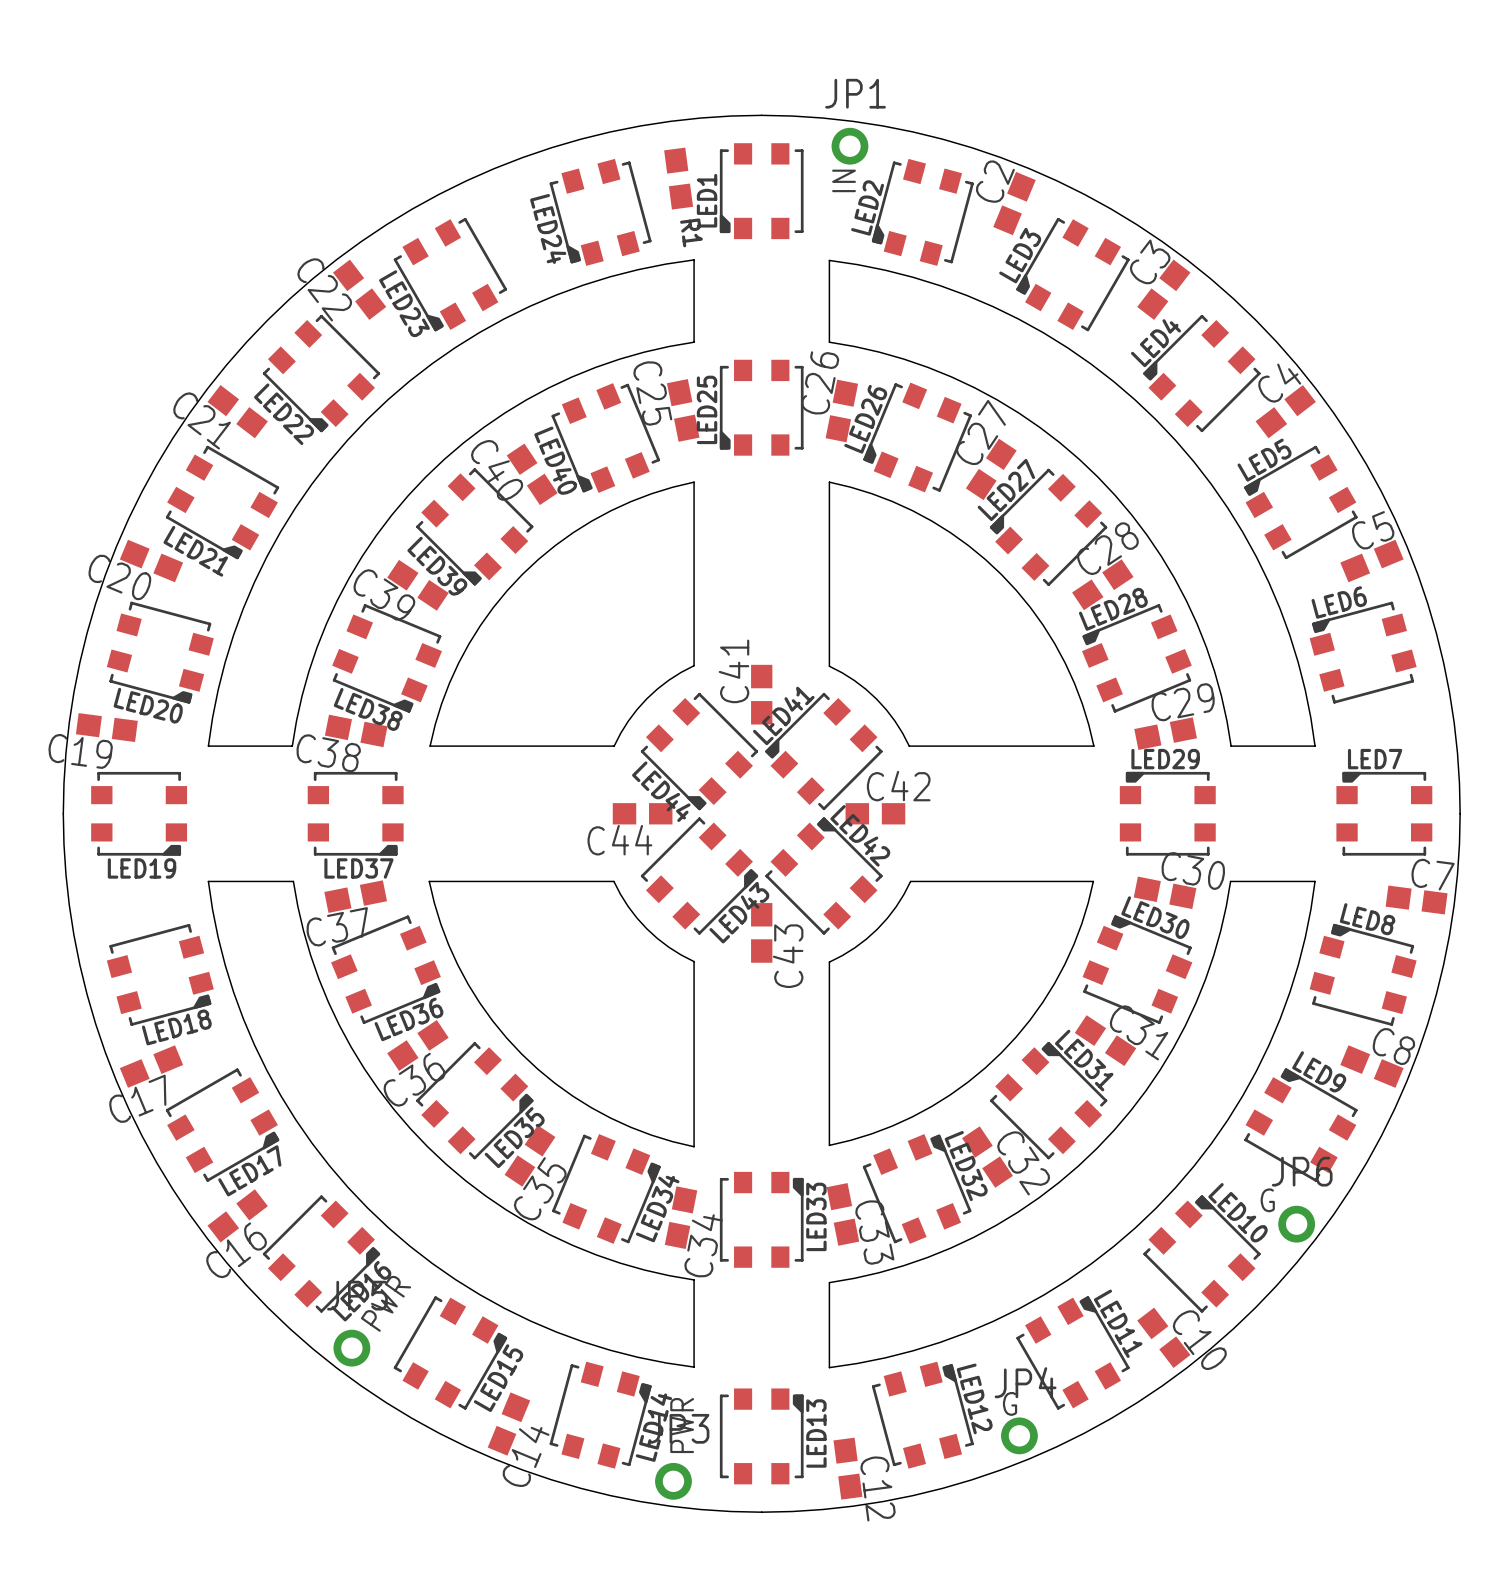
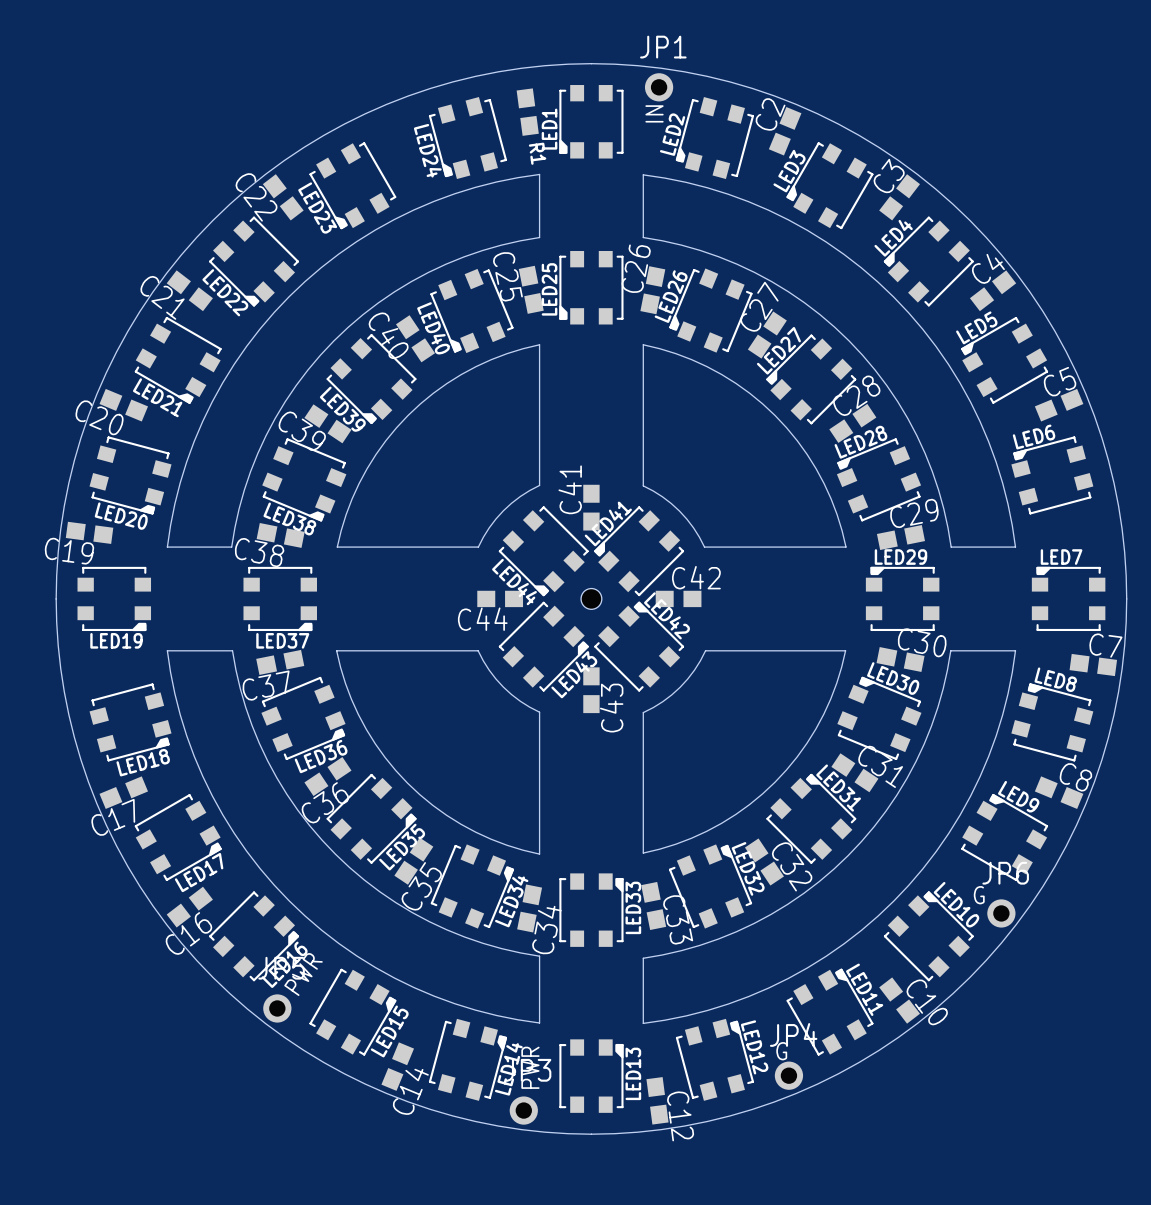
hole: none -> (591, 598)

